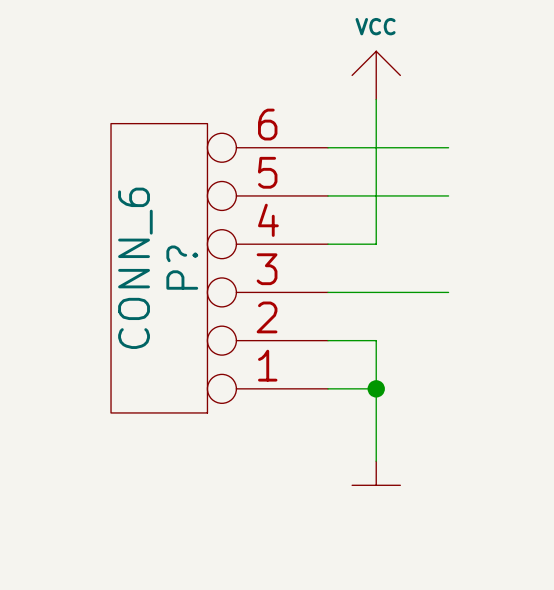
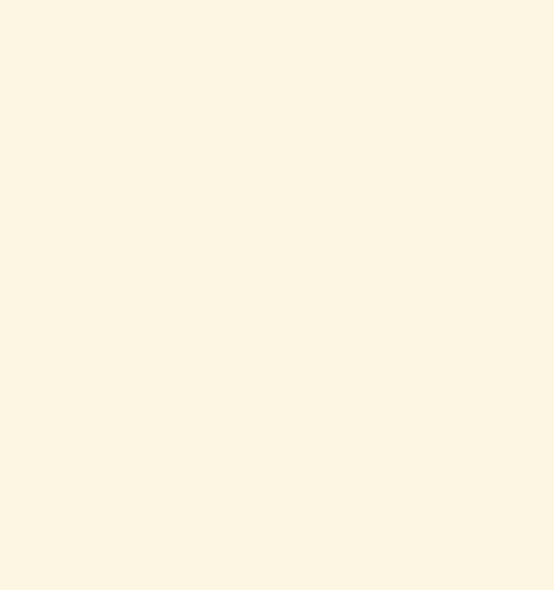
power symbol: VCC (376, 75) -> none
wire: (376, 99) (376, 244) (328, 244) -> none
wire: (328, 147) (448, 147) -> none
wire: (328, 195) (448, 195) -> none
P?: CONN_6 (219, 268) -> none
wire: (328, 292) (448, 292) -> none
wire: (328, 340) (376, 340) (376, 461) -> none
wire: (328, 388) (376, 388) -> none
junction: (376, 388) -> none
power symbol: (376, 473) -> none

